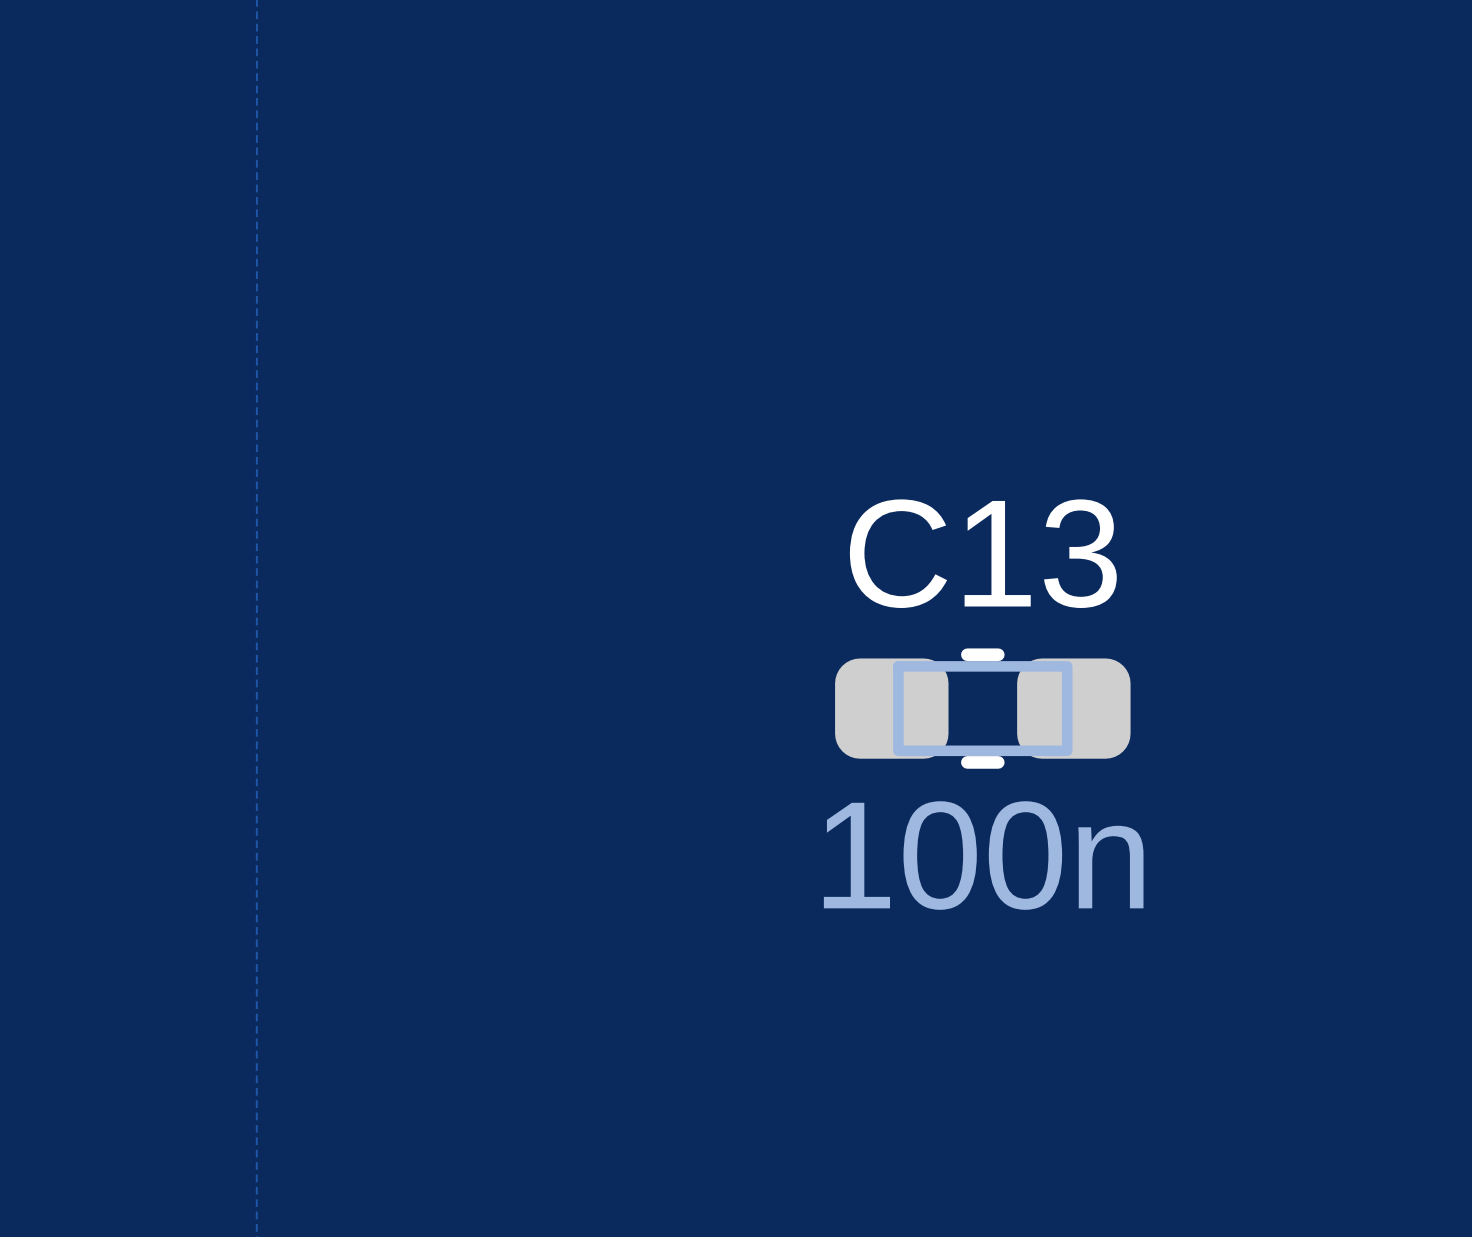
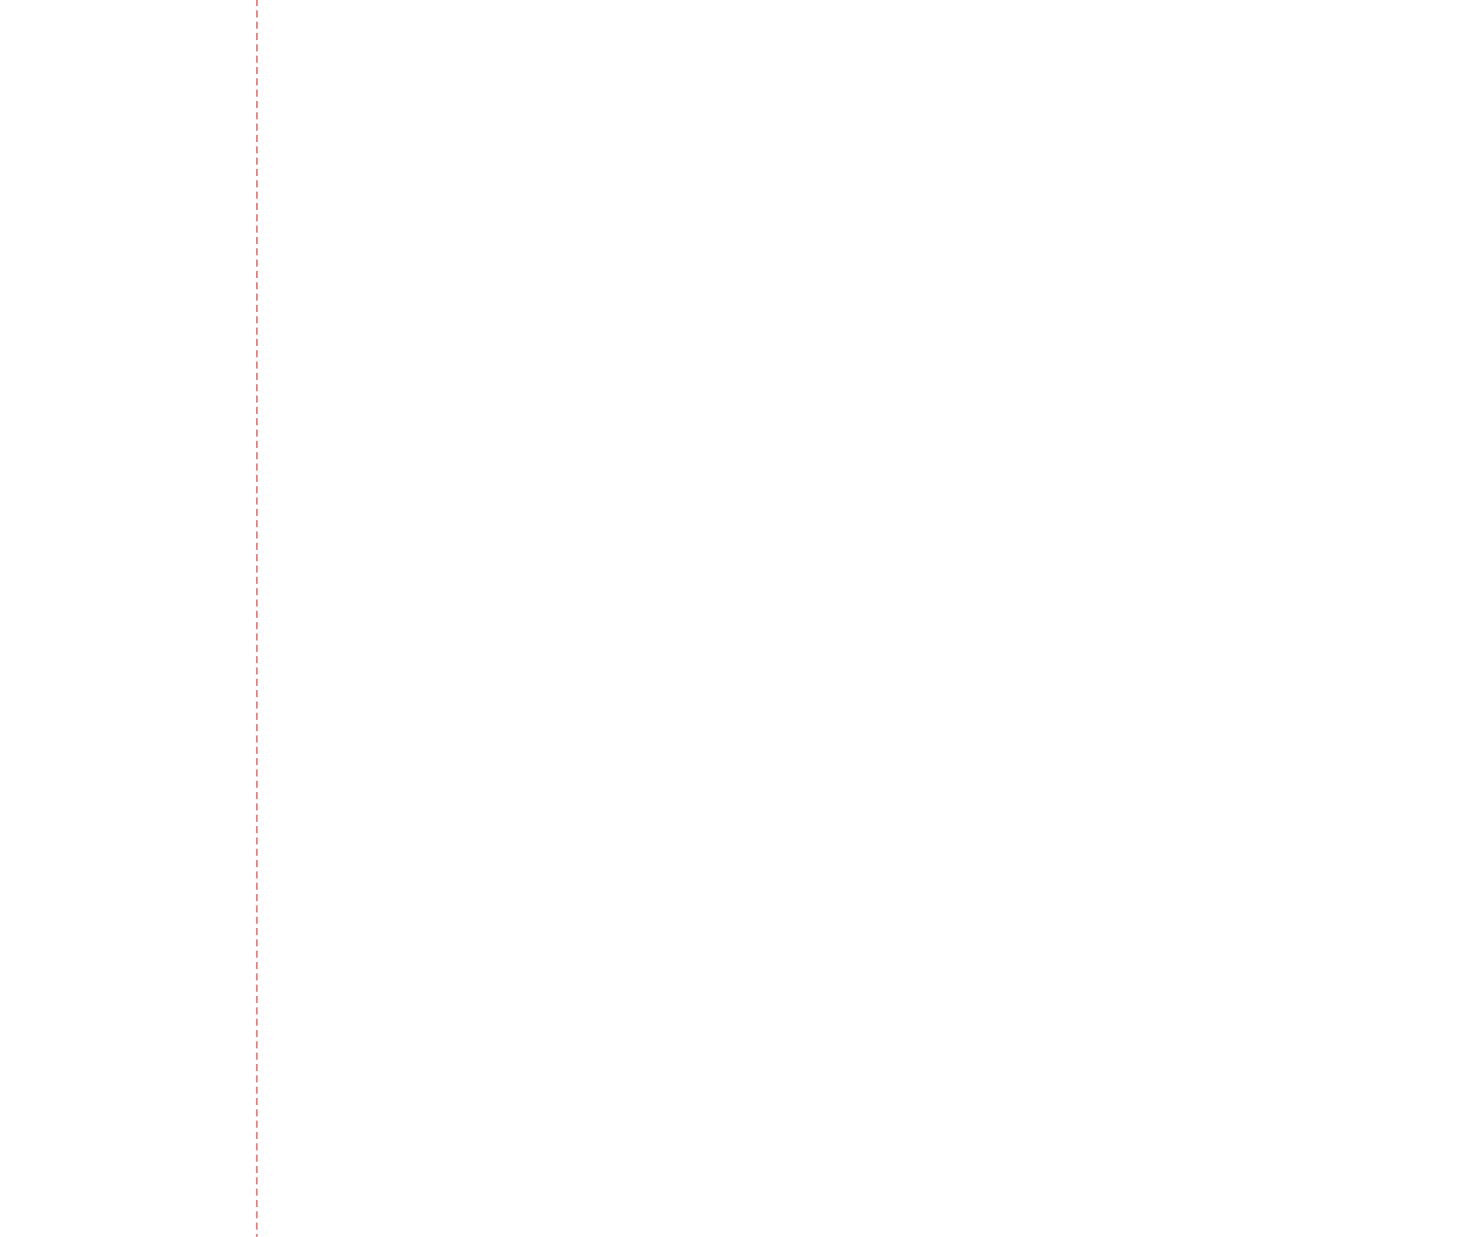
C13: 100n (982, 708) -> none

